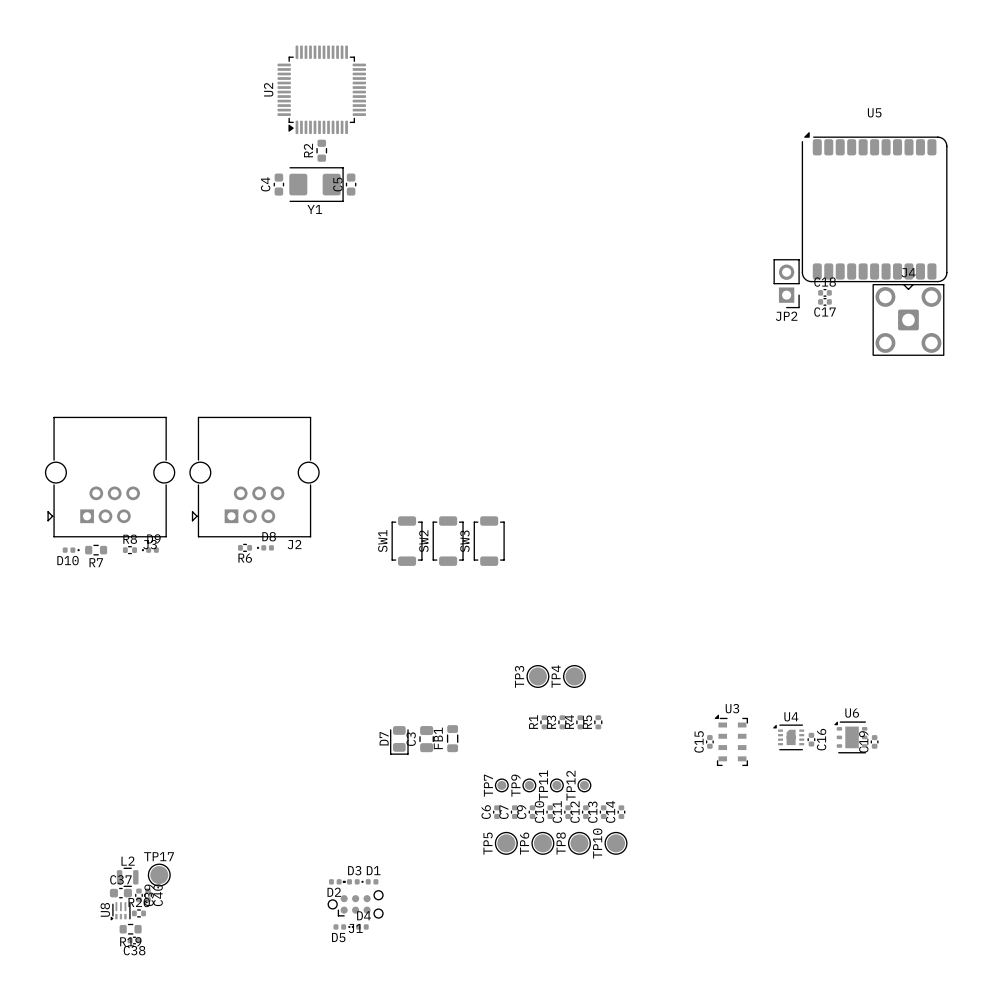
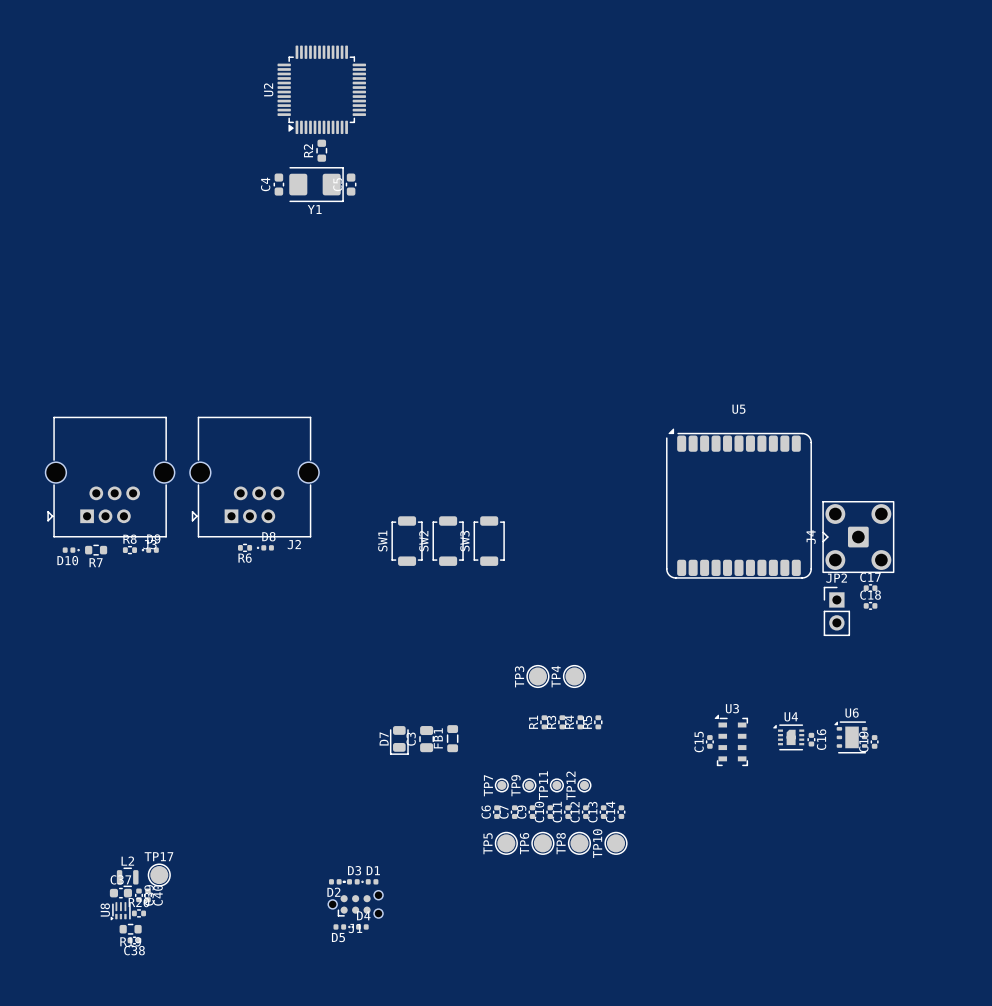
U5 position: (874, 207) -> (738, 503)
JP2 rotation: 0° (786, 283) -> 180° (836, 611)
JP2 position: (786, 283) -> (836, 611)
C18 position: (824, 292) -> (870, 605)
C17 position: (824, 301) -> (870, 588)
C17 name position: C17 (824, 312) -> C17 (870, 577)
J4 rotation: 0° (908, 319) -> 90° counterclockwise (858, 537)
J4 position: (908, 319) -> (858, 537)

